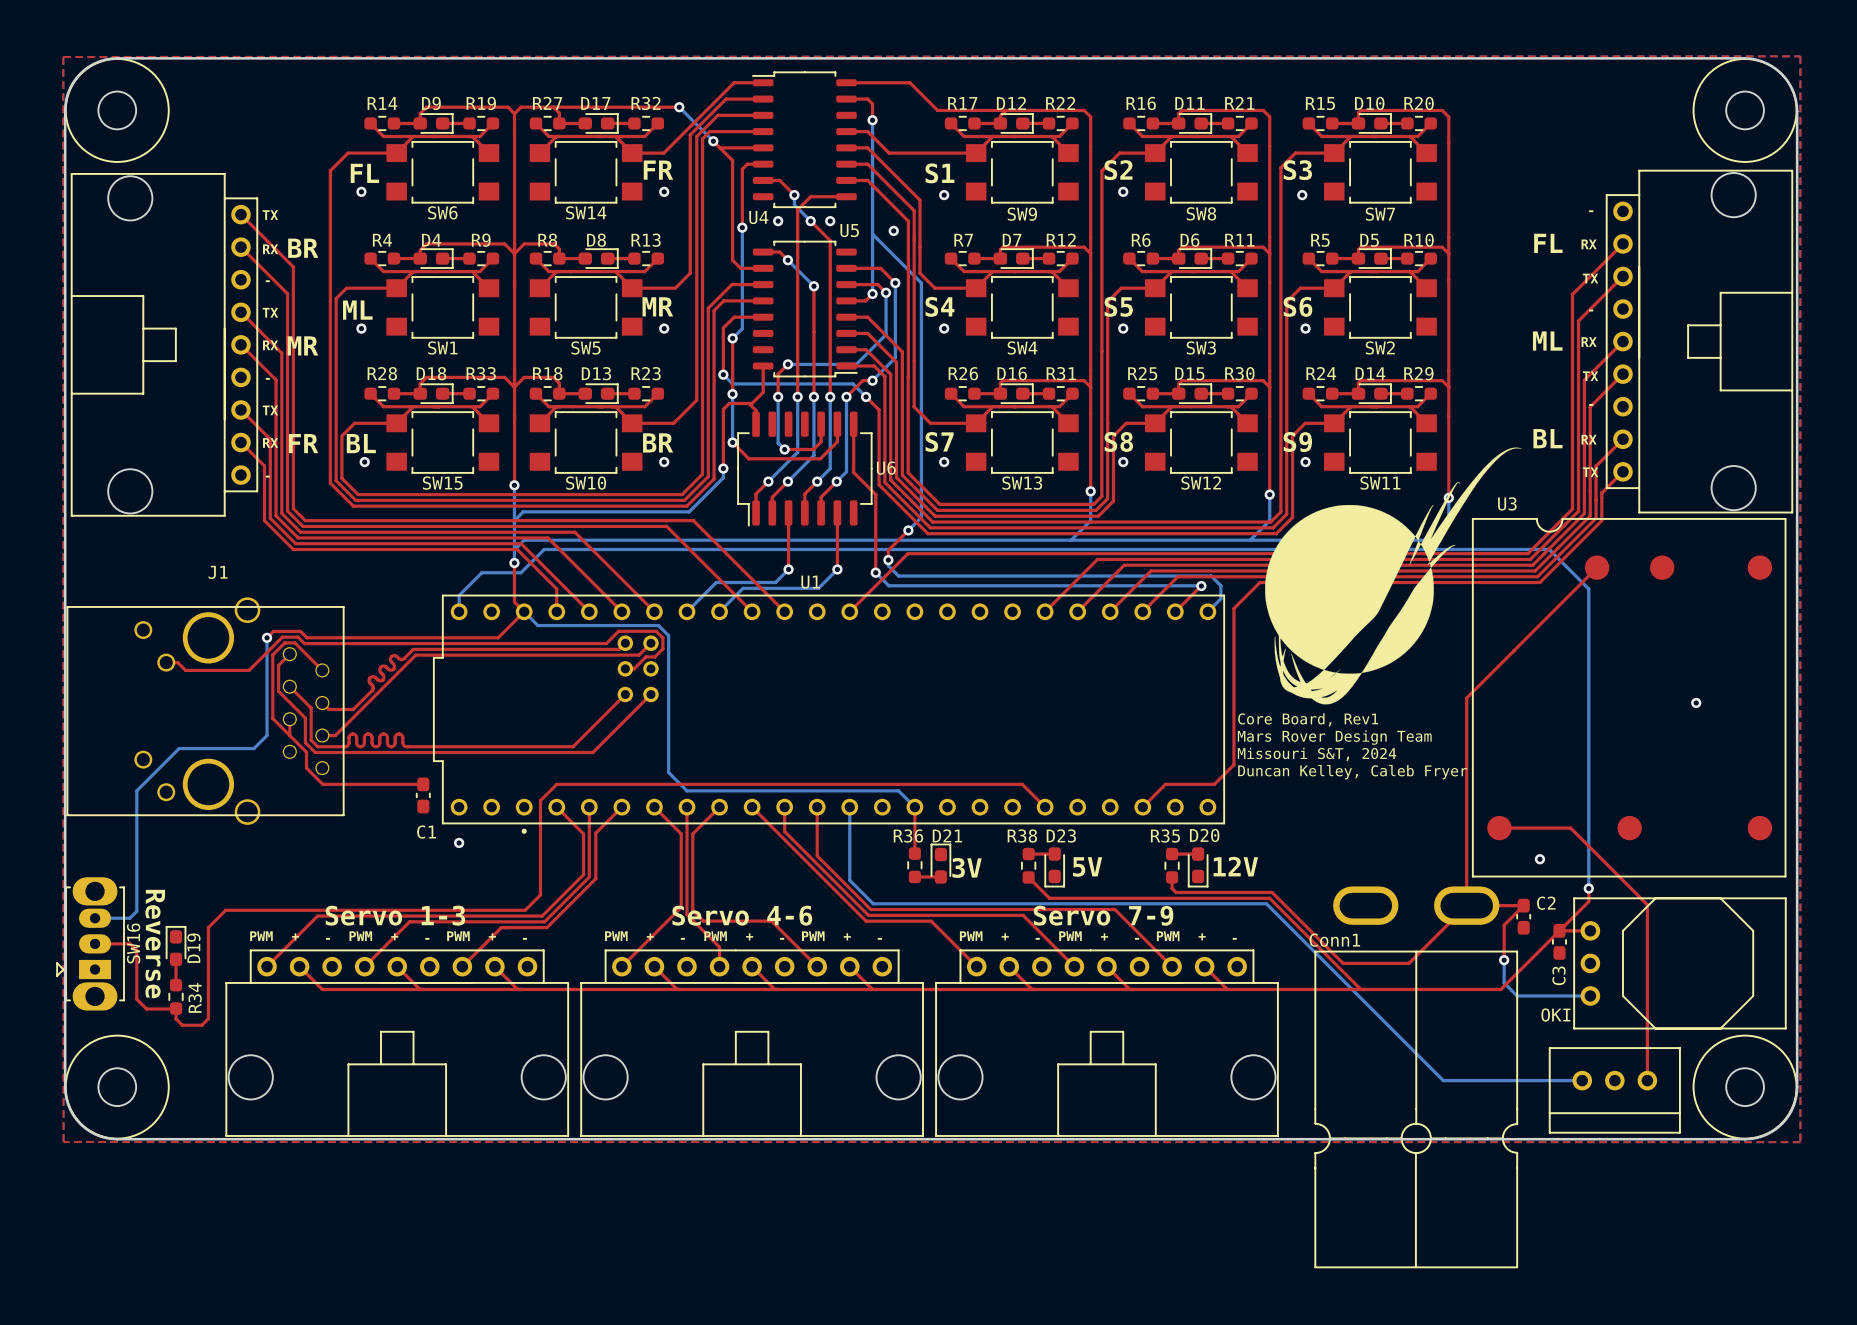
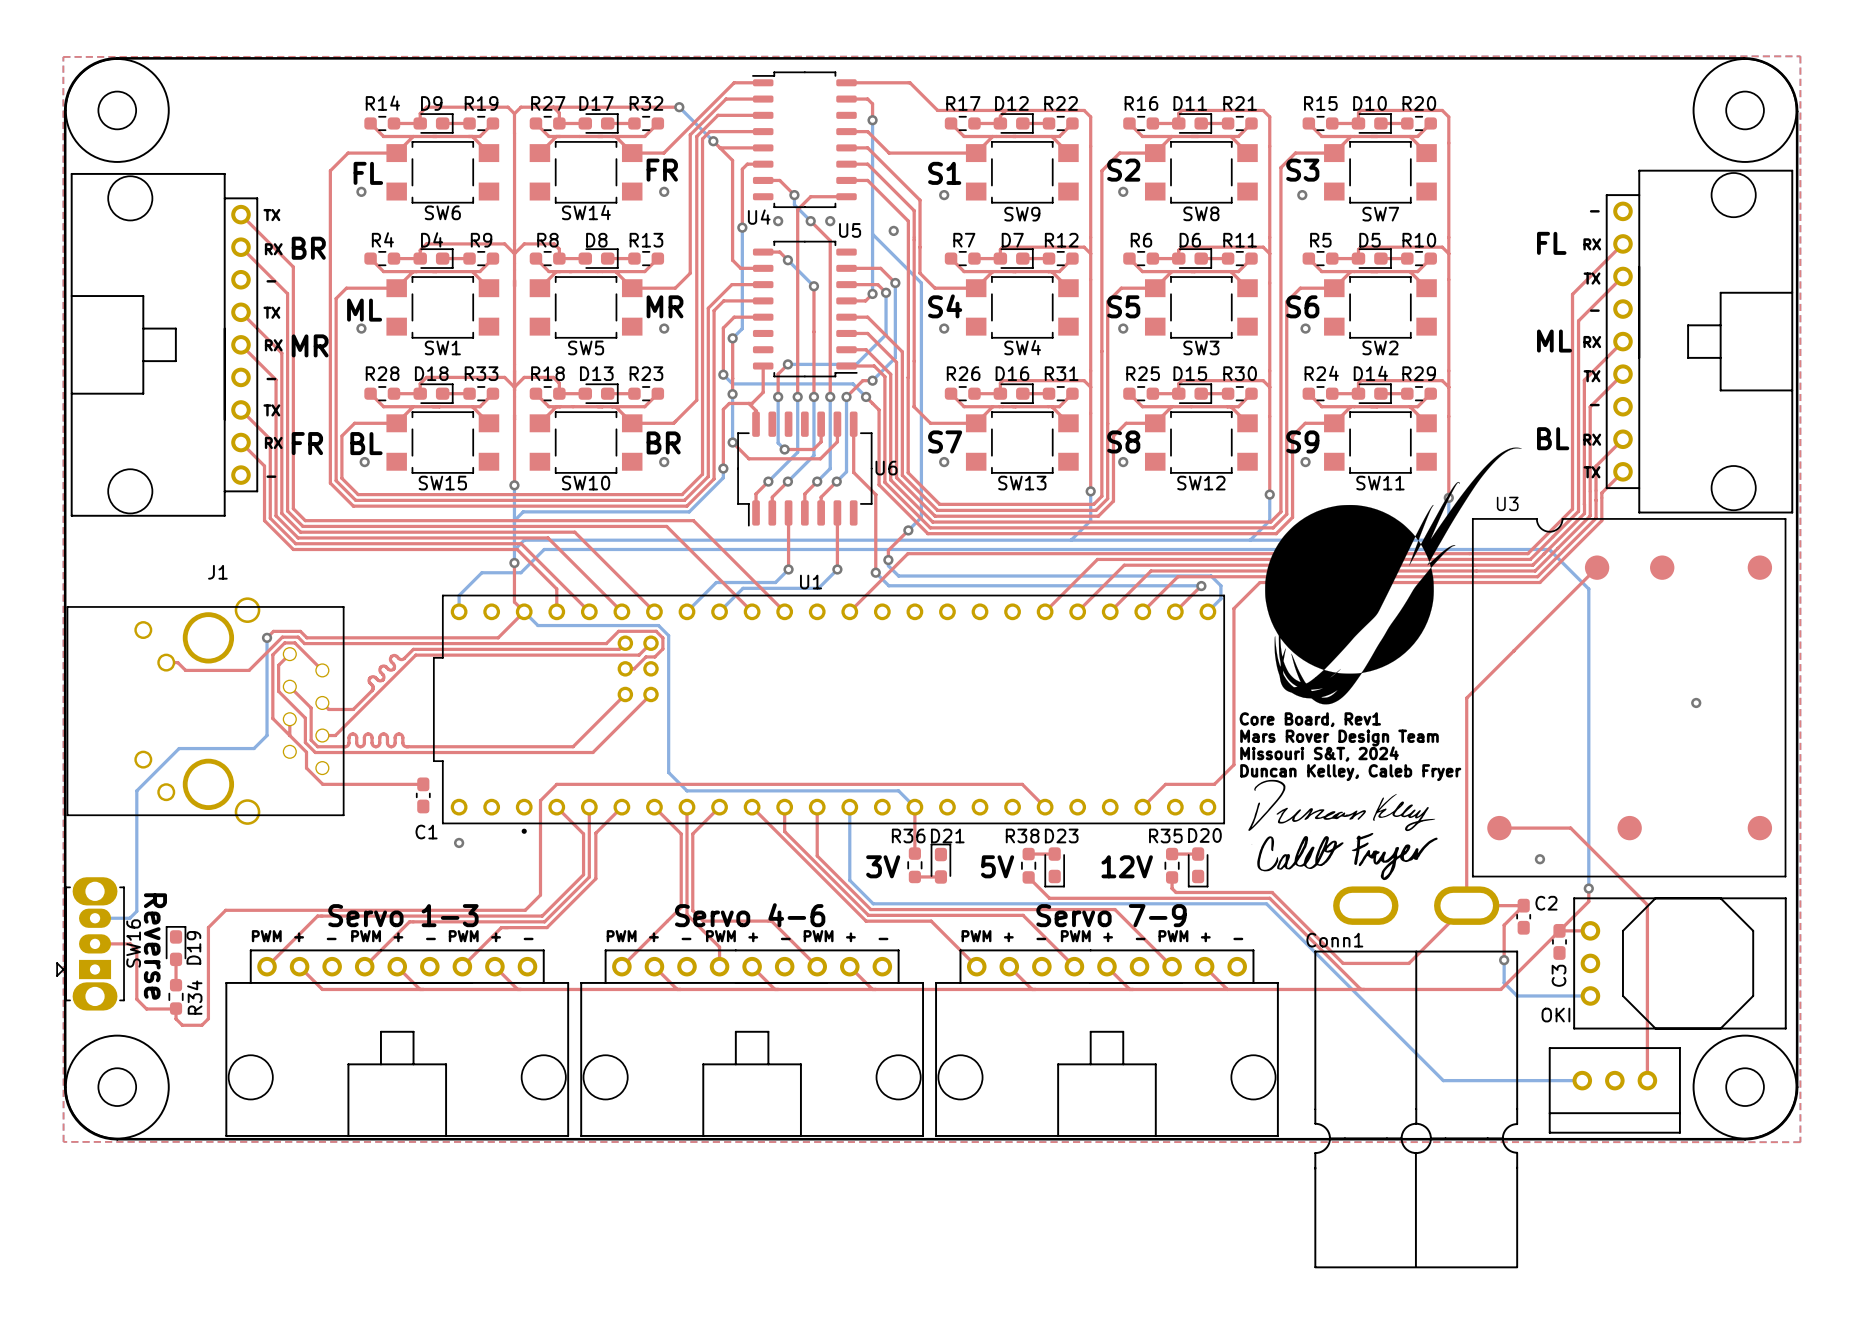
drawing: none -> [1248, 779, 1438, 881]
text position: 5V (1087, 866) -> 5V (997, 866)
text position: 12V (1235, 866) -> 12V (1127, 866)
text position: 3V (967, 867) -> 3V (883, 866)

